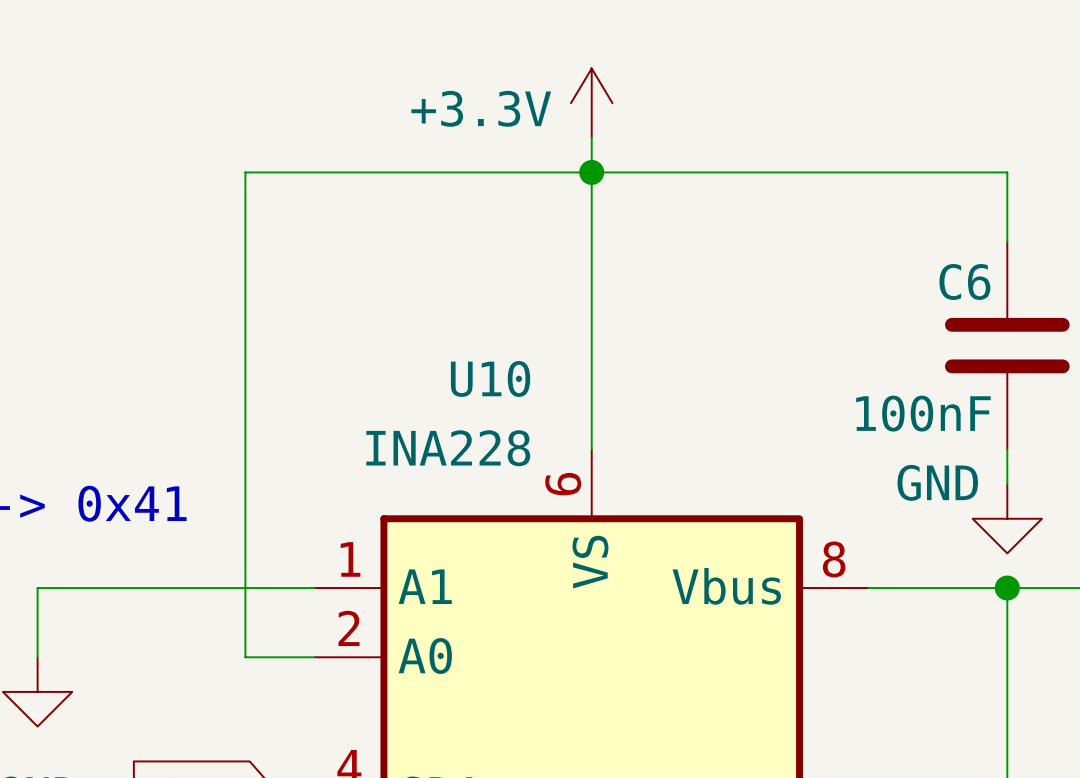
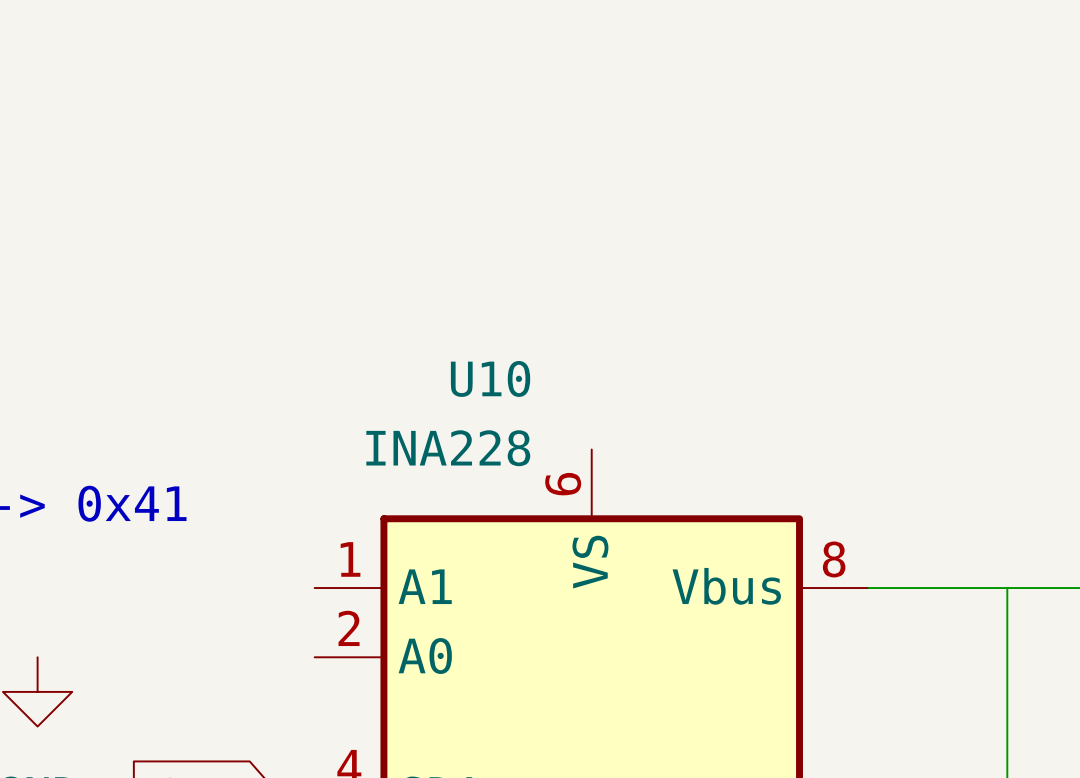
power symbol: +3.3V (591, 103) -> none
wire: (591, 137) (591, 449) -> none
junction: (591, 172) -> none
wire: (1007, 241) (1007, 172) (245, 172) (245, 657) (314, 657) -> none
C6: 100nF (1007, 345) -> none
wire: (1007, 449) (1007, 484) -> none
power symbol: GND (1007, 518) -> none
wire: (314, 588) (37, 588) (37, 657) -> none
junction: (1007, 588) -> none

